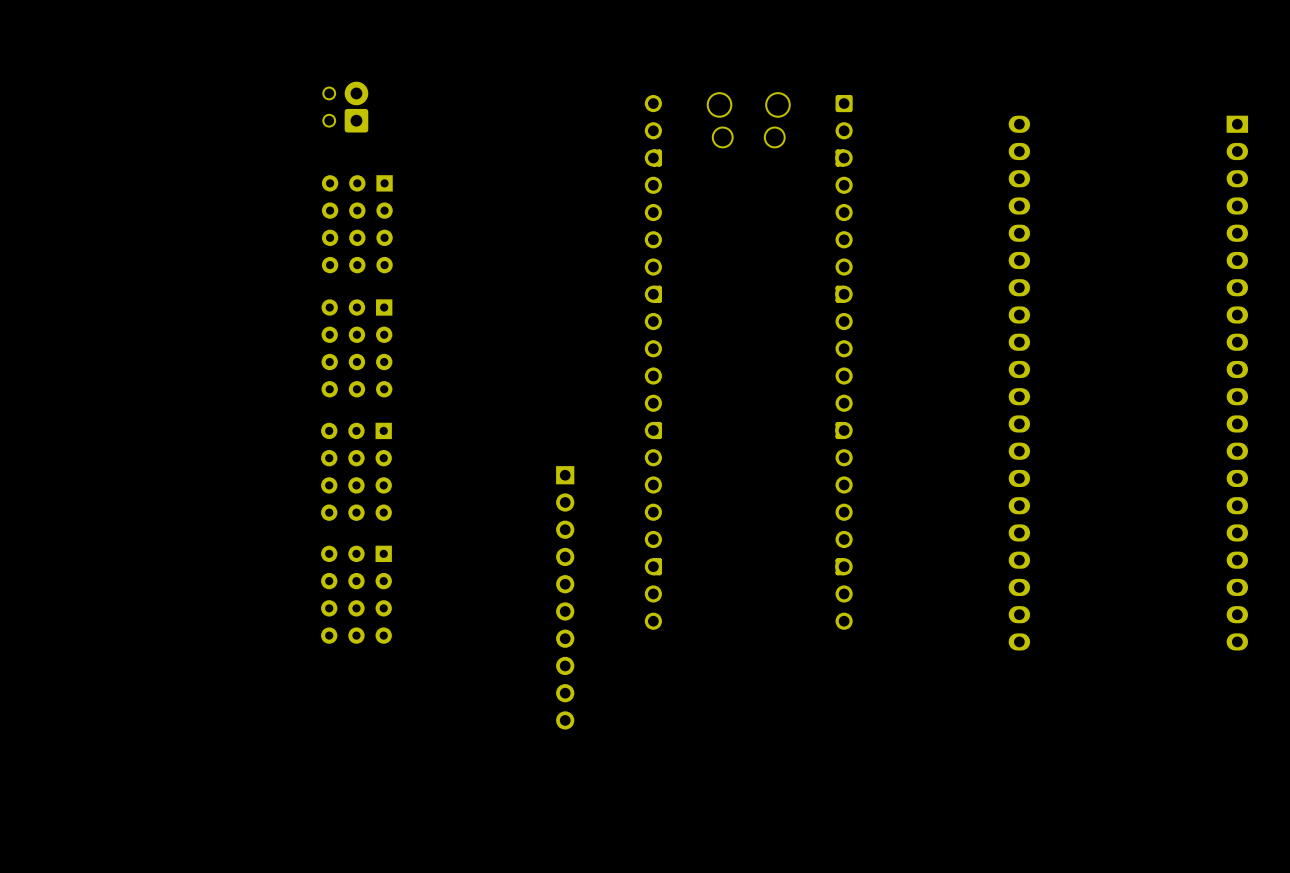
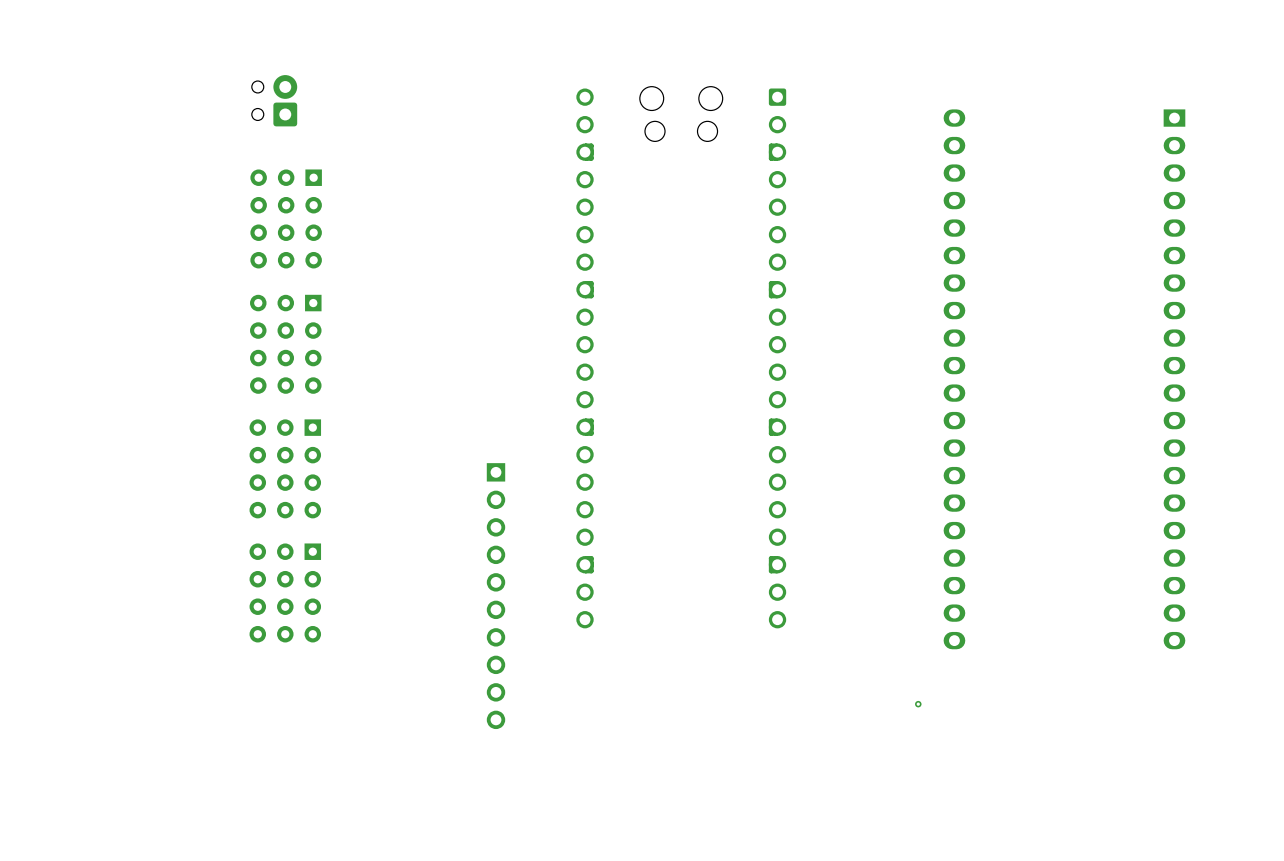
via: none -> (918, 704)

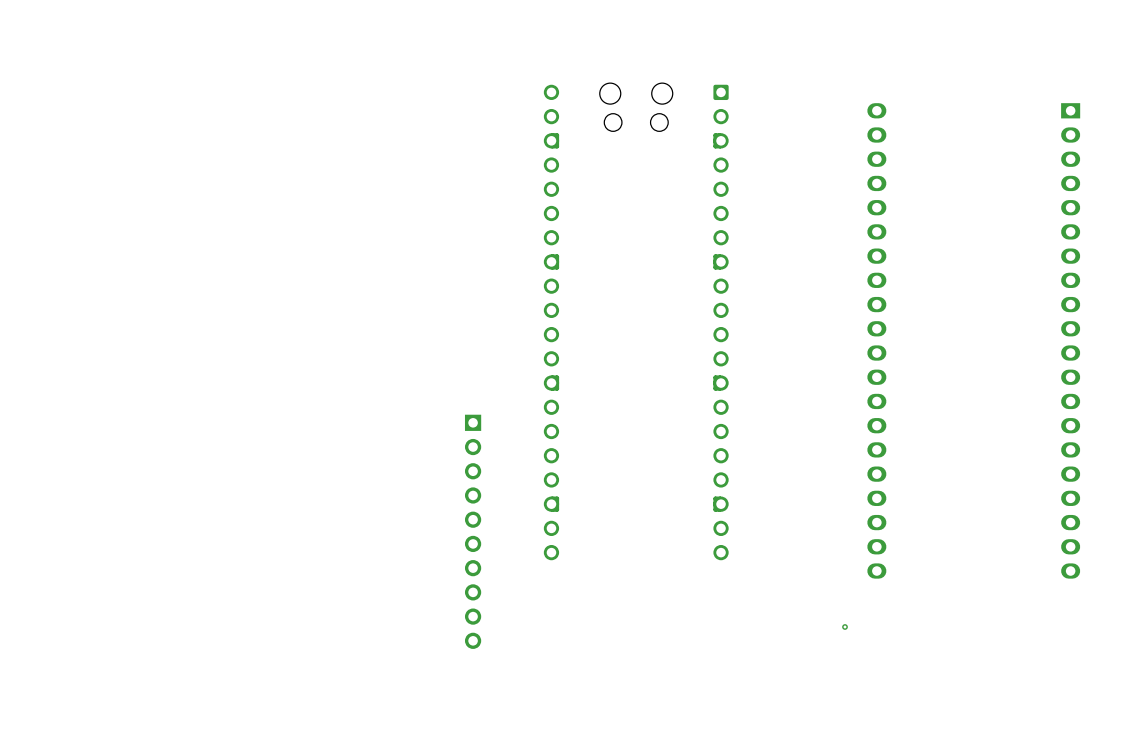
part: (274, 100) -> none
part: (286, 218) -> none
part: (285, 344) -> none
part: (285, 468) -> none
part: (285, 592) -> none

